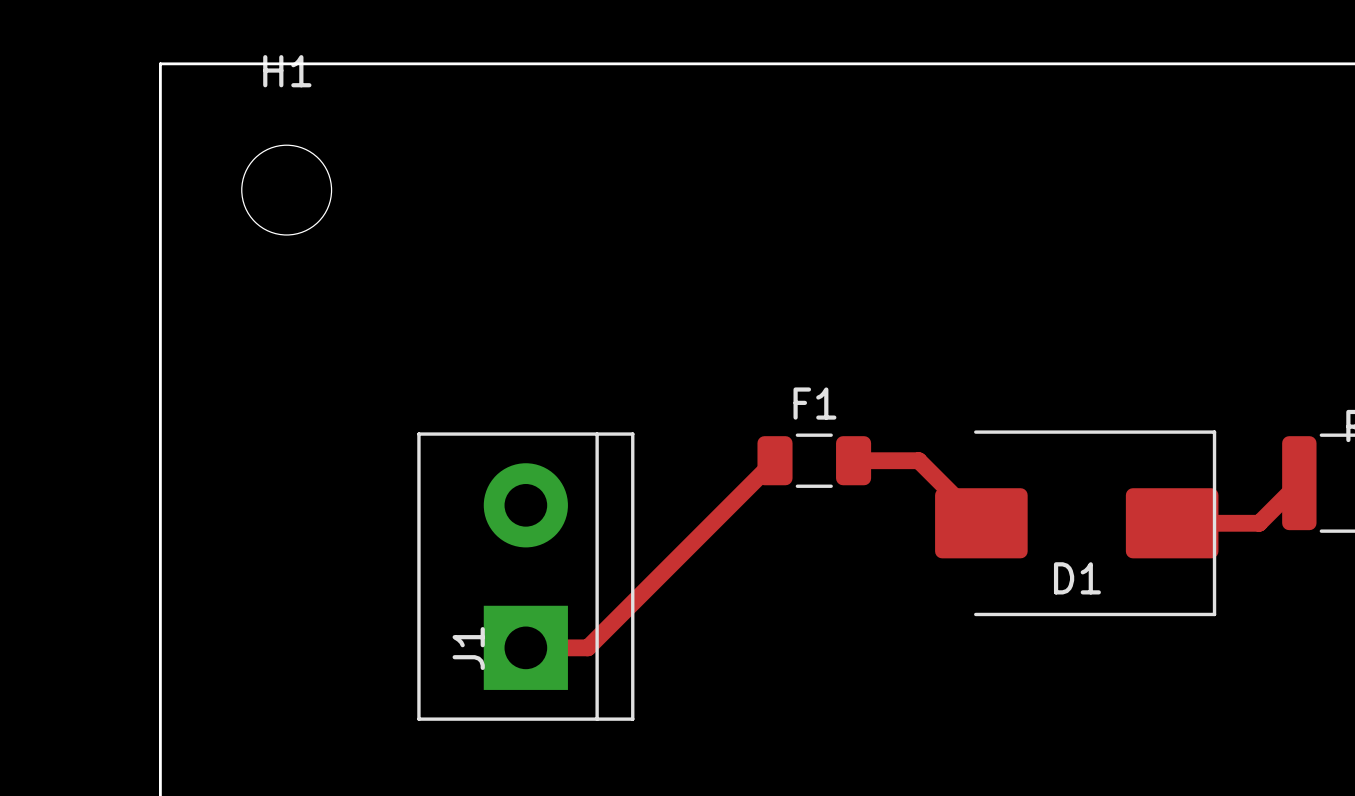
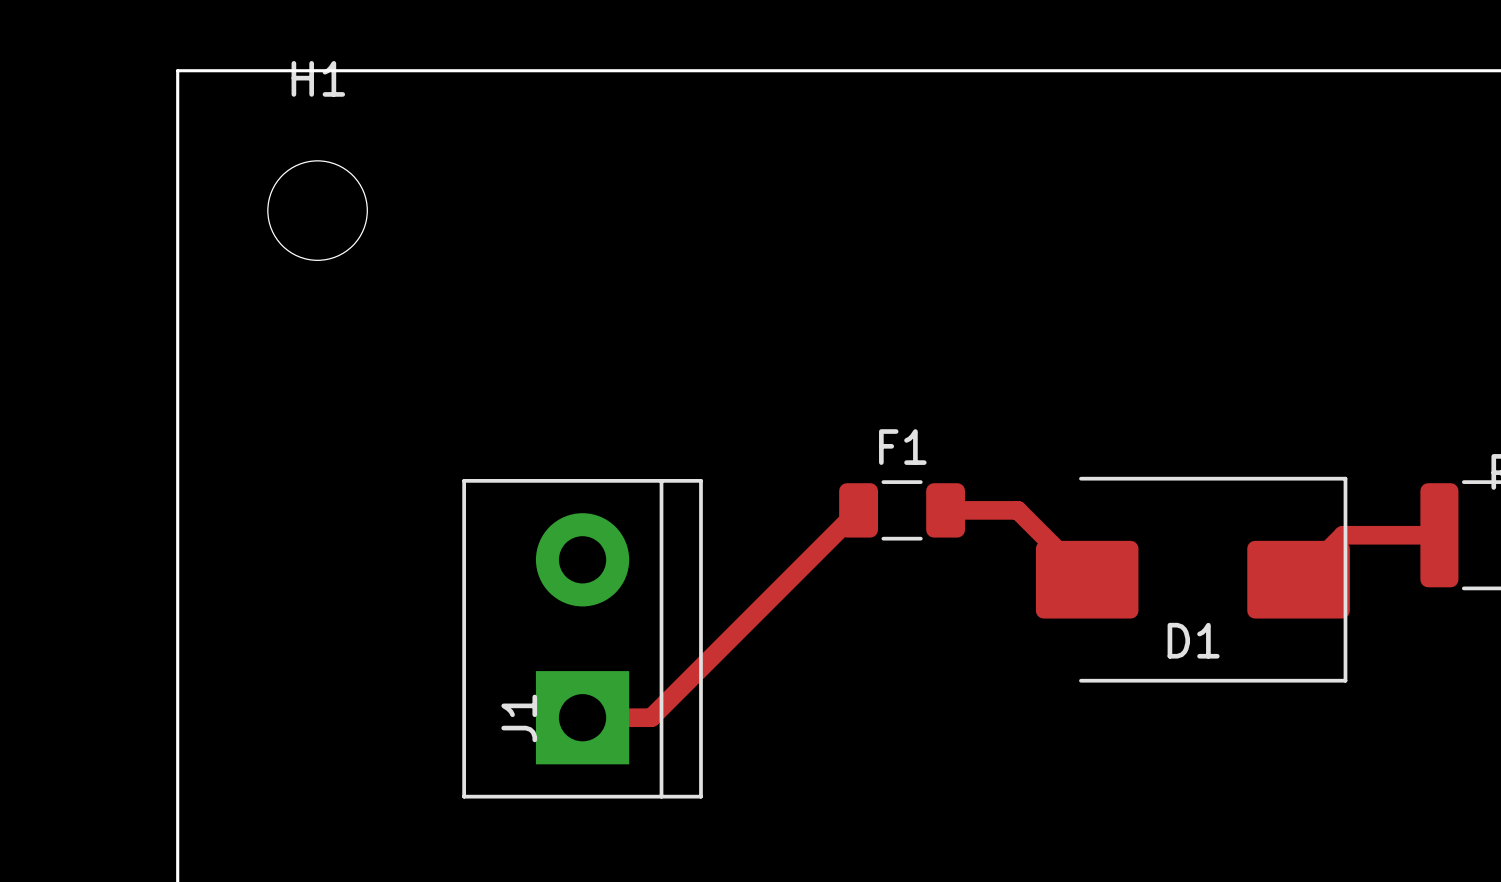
track: (1299, 483) (1259, 523) (1172, 523) -> (1439, 535) (1342, 535) (1298, 579)

